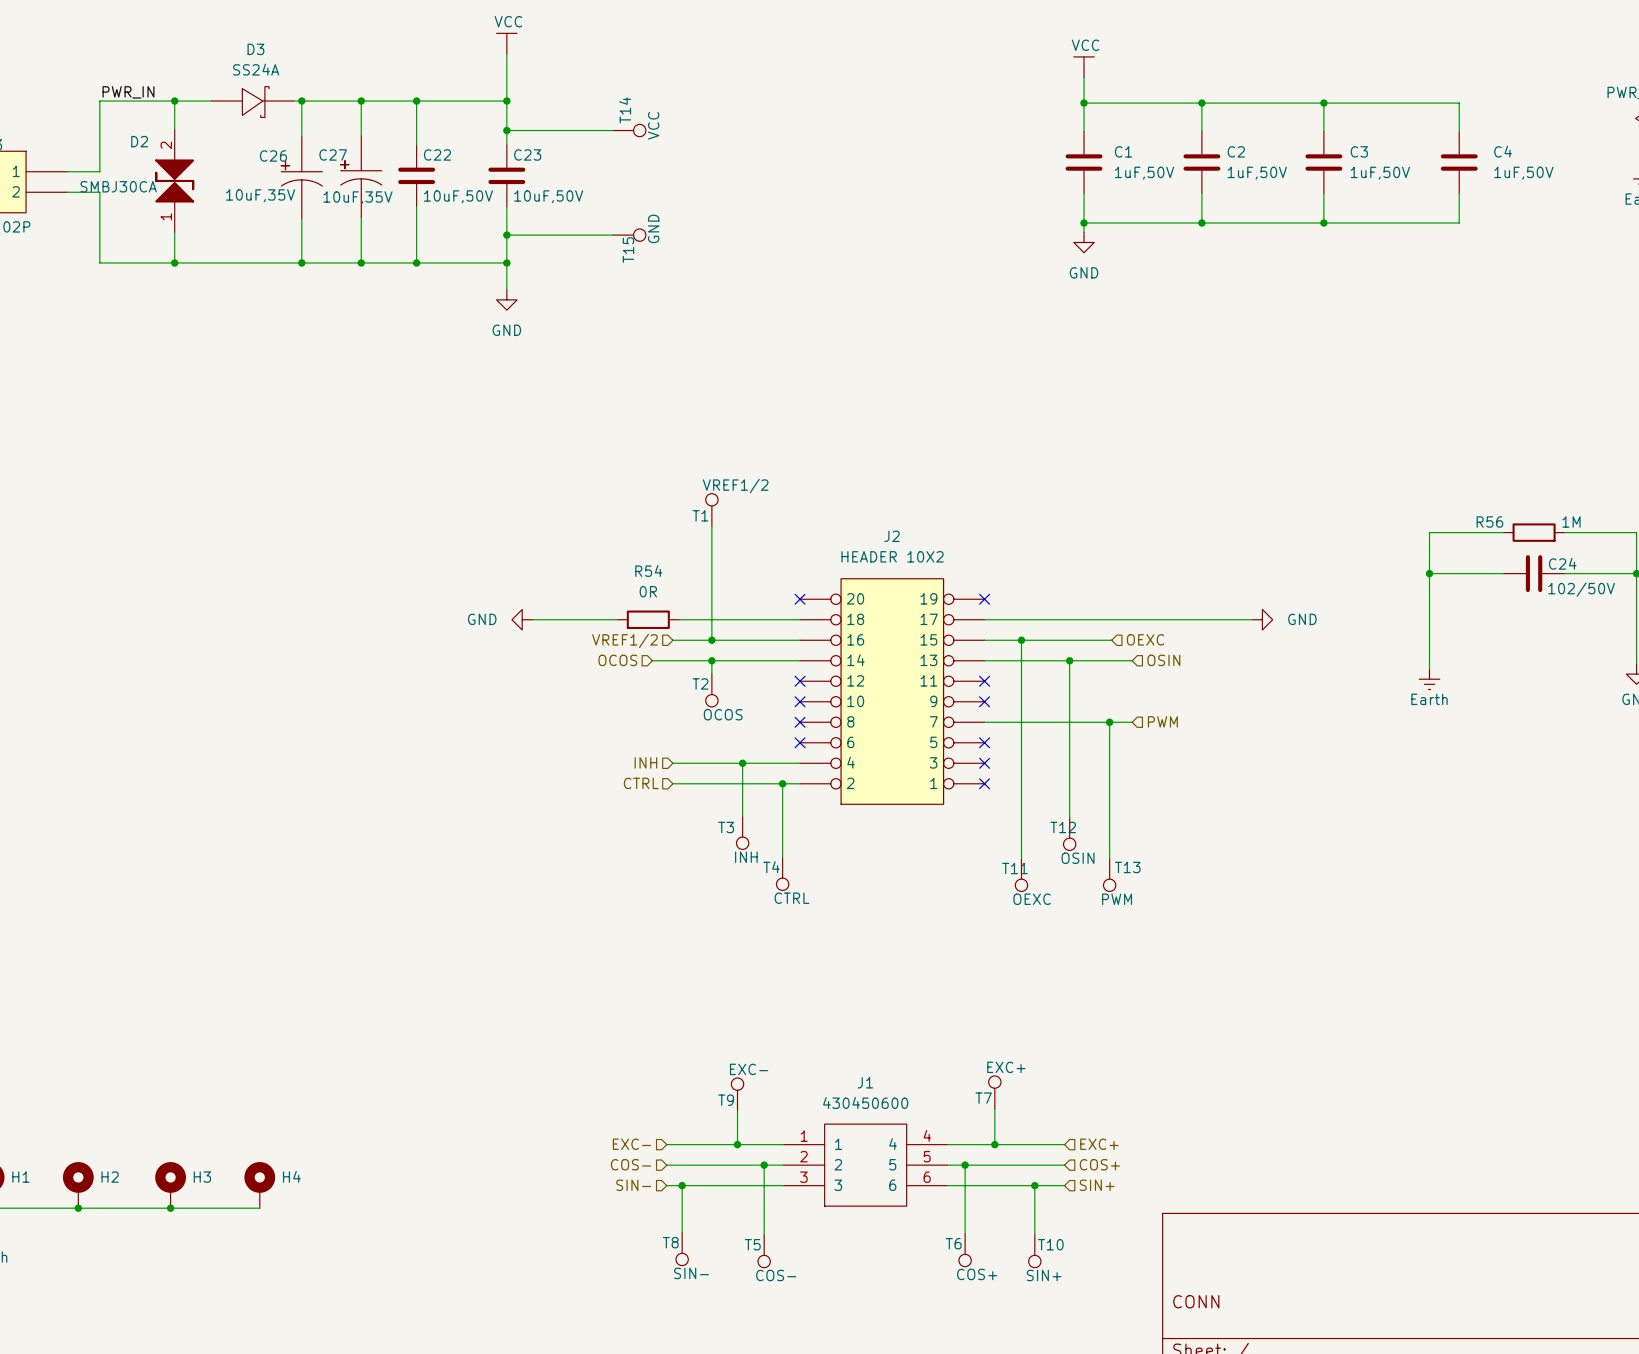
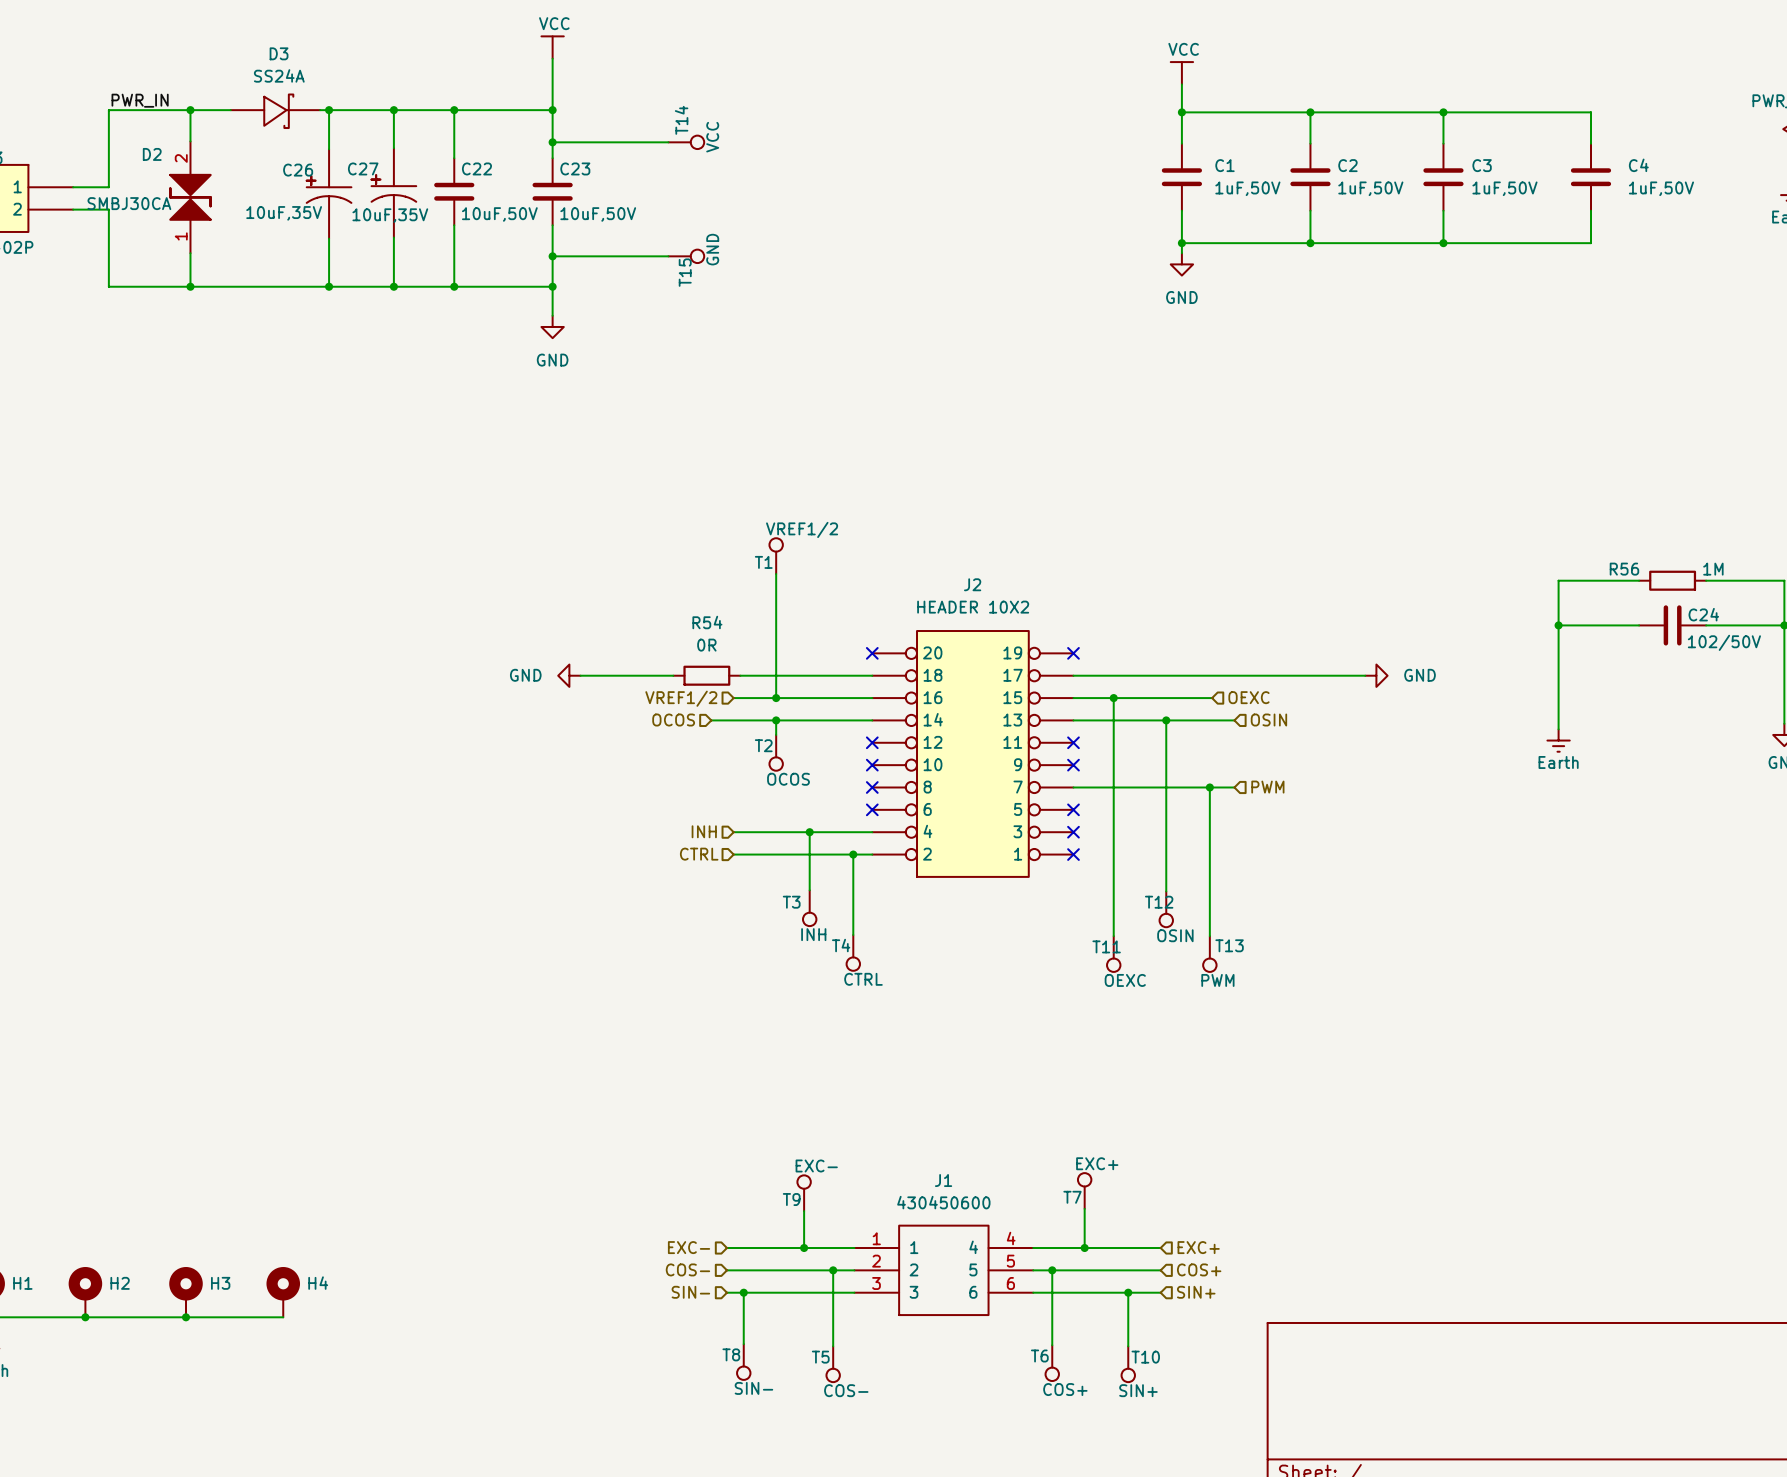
title block: CONN (1196, 1301) -> none

